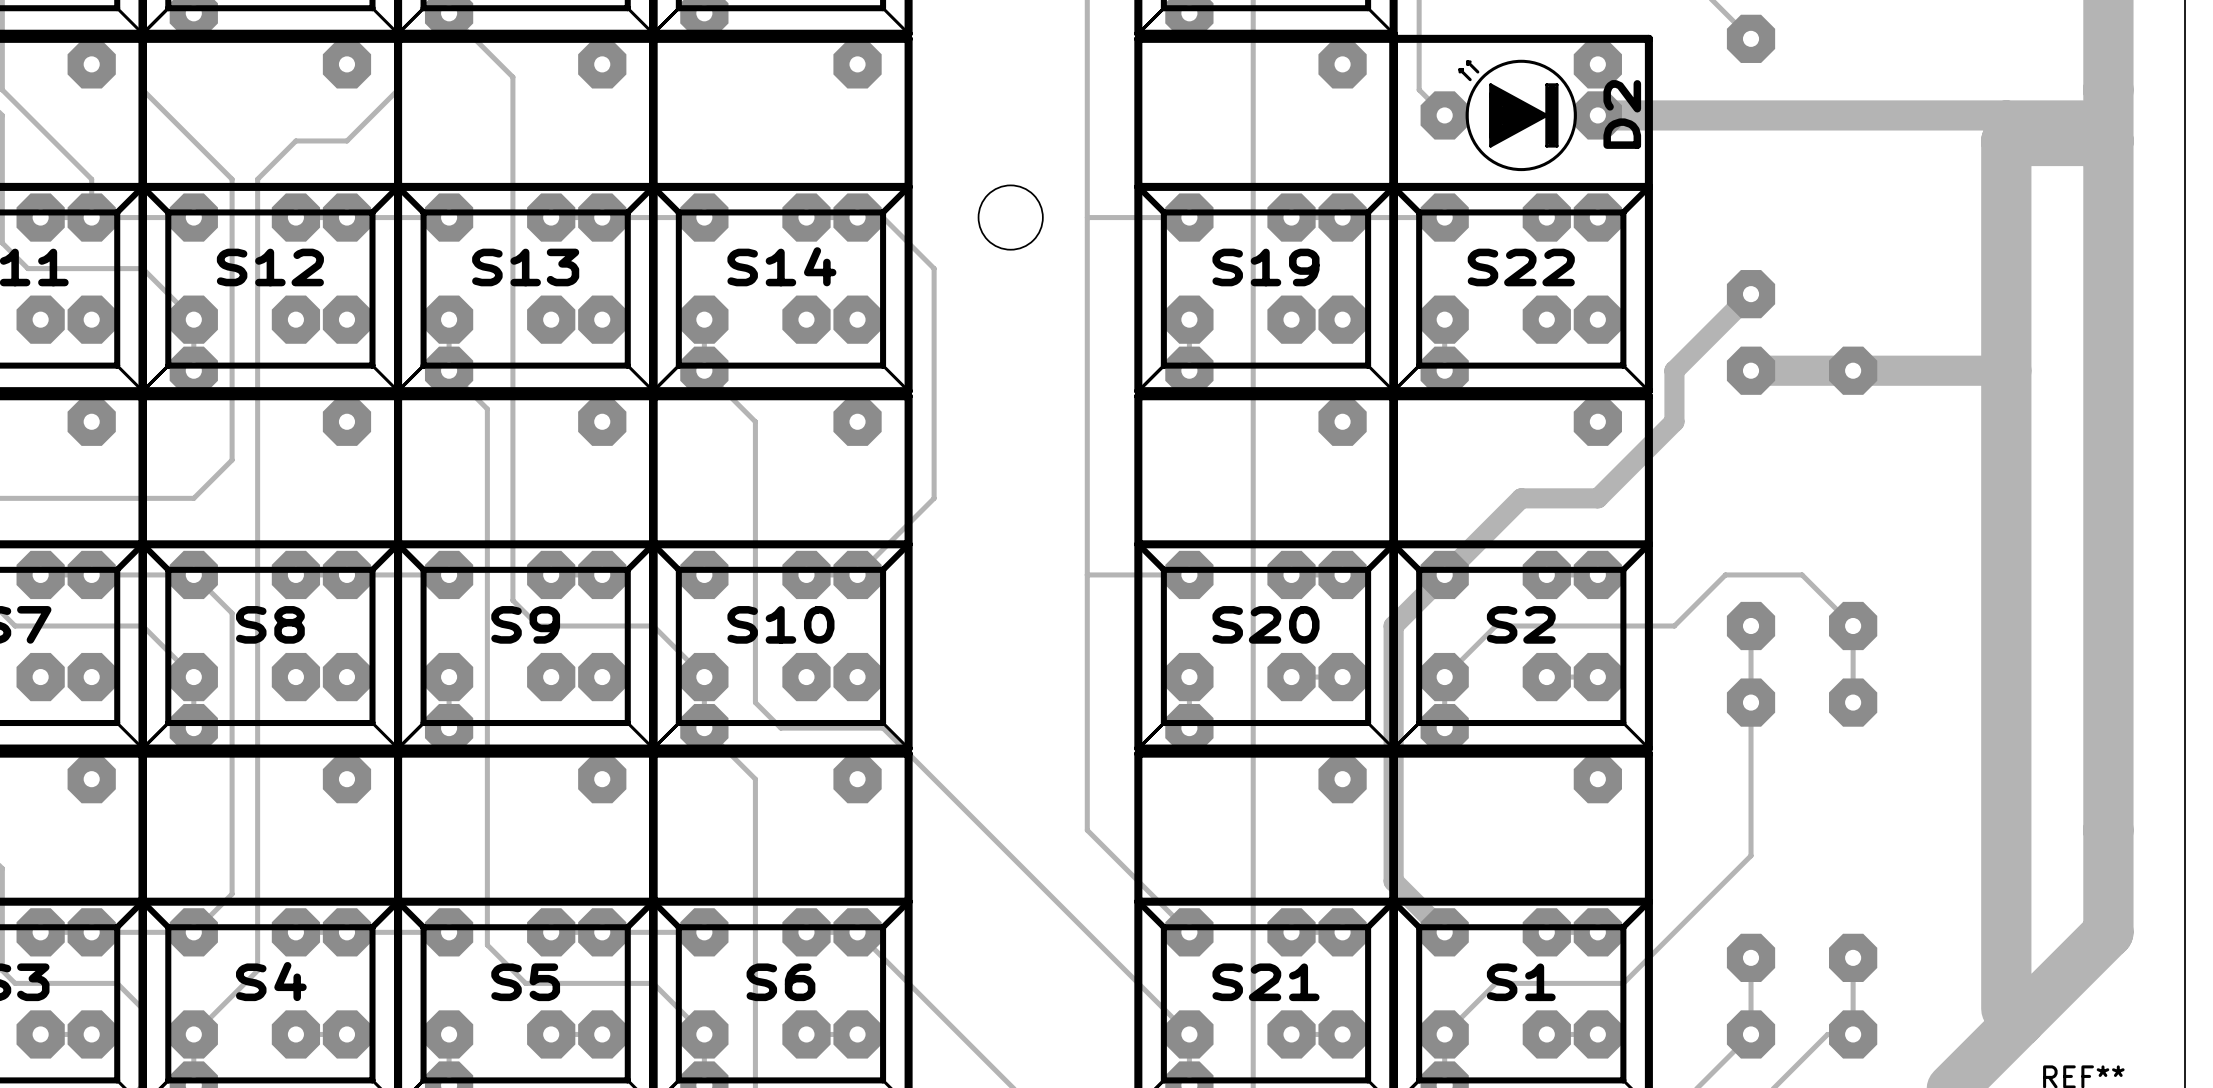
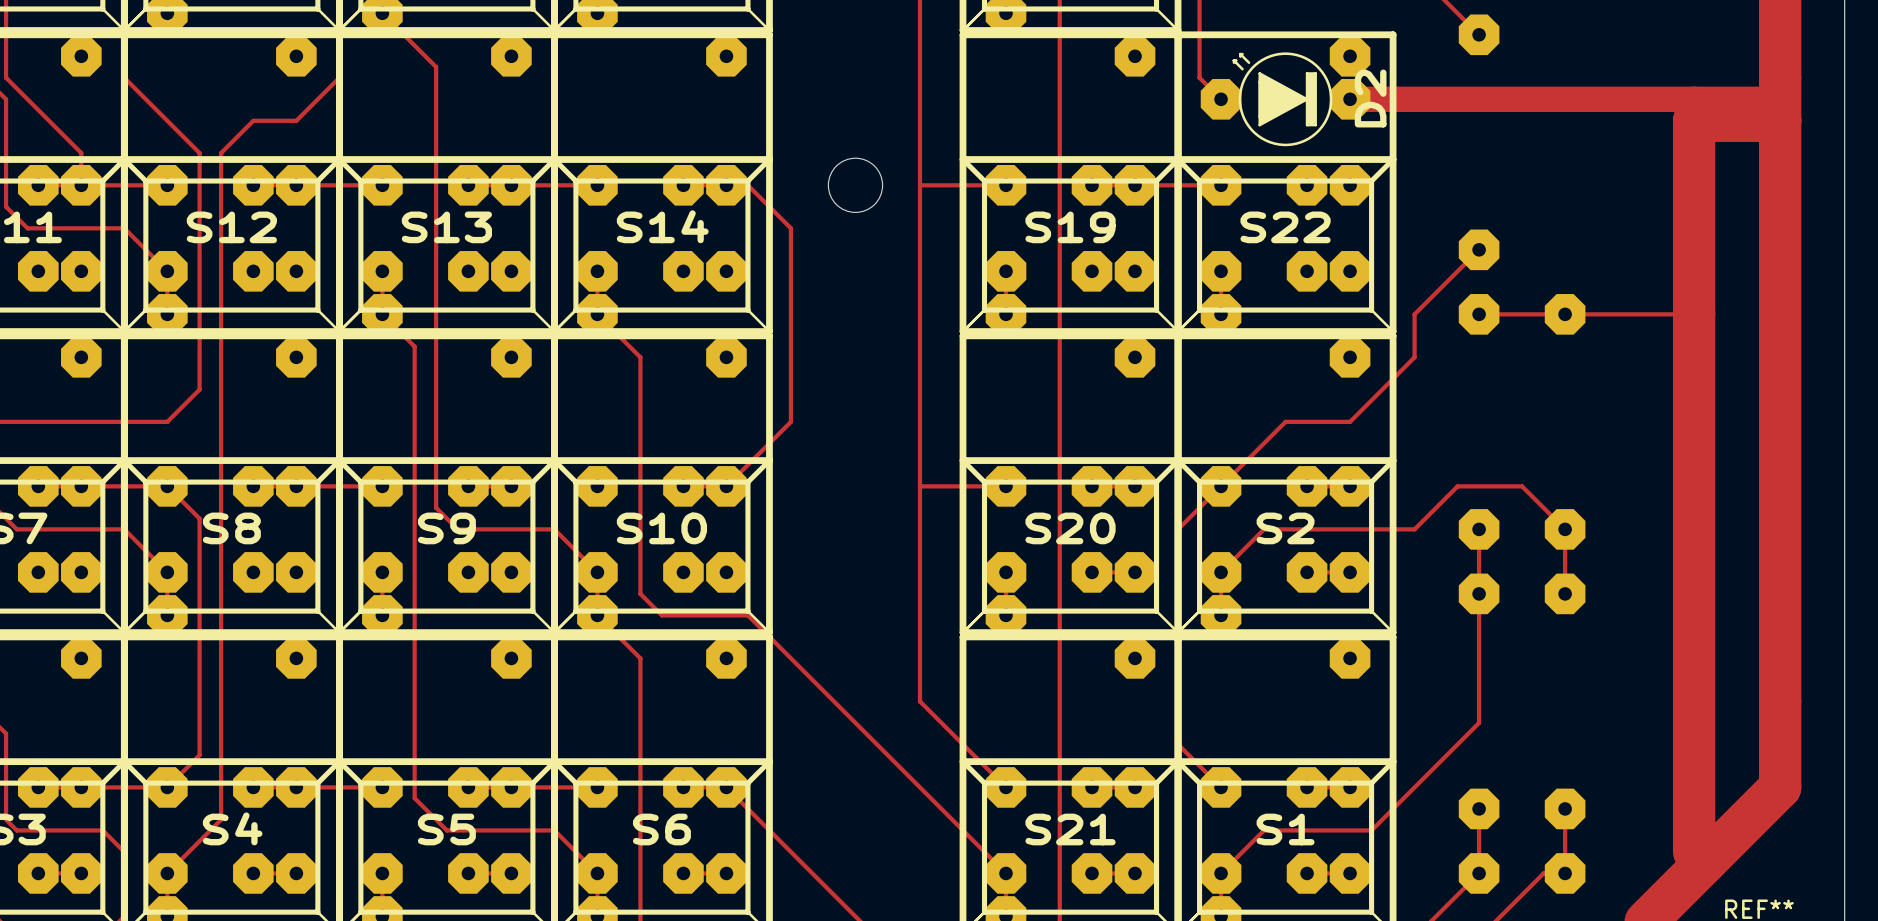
track width: thick (1751, 294) (1674, 370) (1674, 421) (1597, 498) (1521, 498) (1393, 626) (1393, 881) (1444, 932) -> thin (1479, 249) (1414, 314) (1414, 357) (1350, 421) (1285, 421) (1178, 529) (1178, 744) (1221, 787)
track width: thick (1751, 370) (2006, 370) -> thin (1479, 314) (1694, 314)

